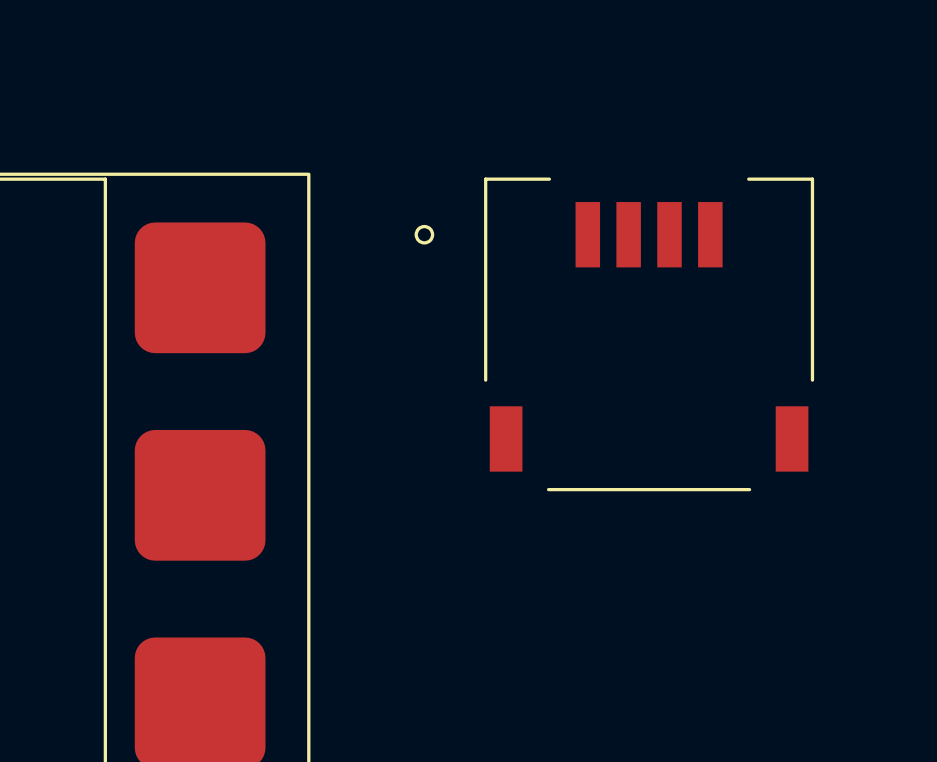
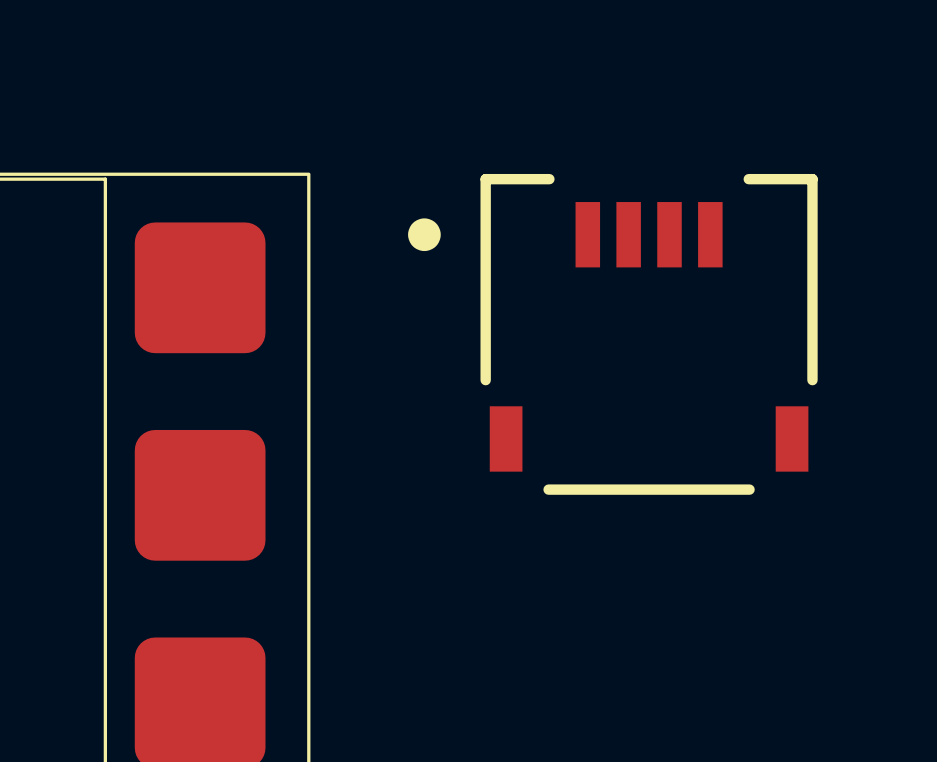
part footprint: [414, 177, 815, 492] -> [408, 173, 818, 495]

